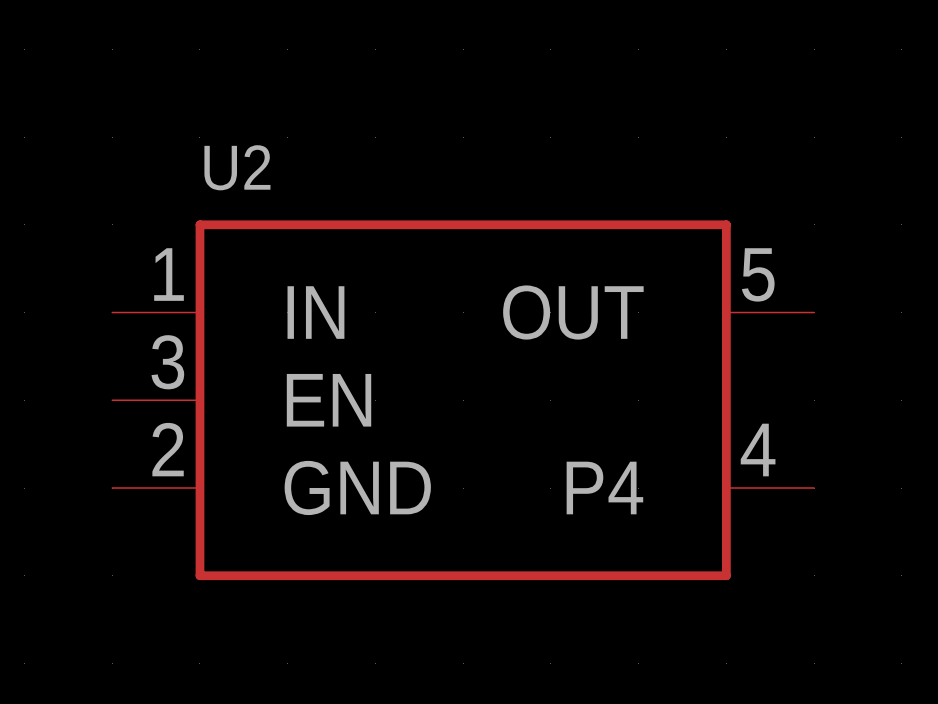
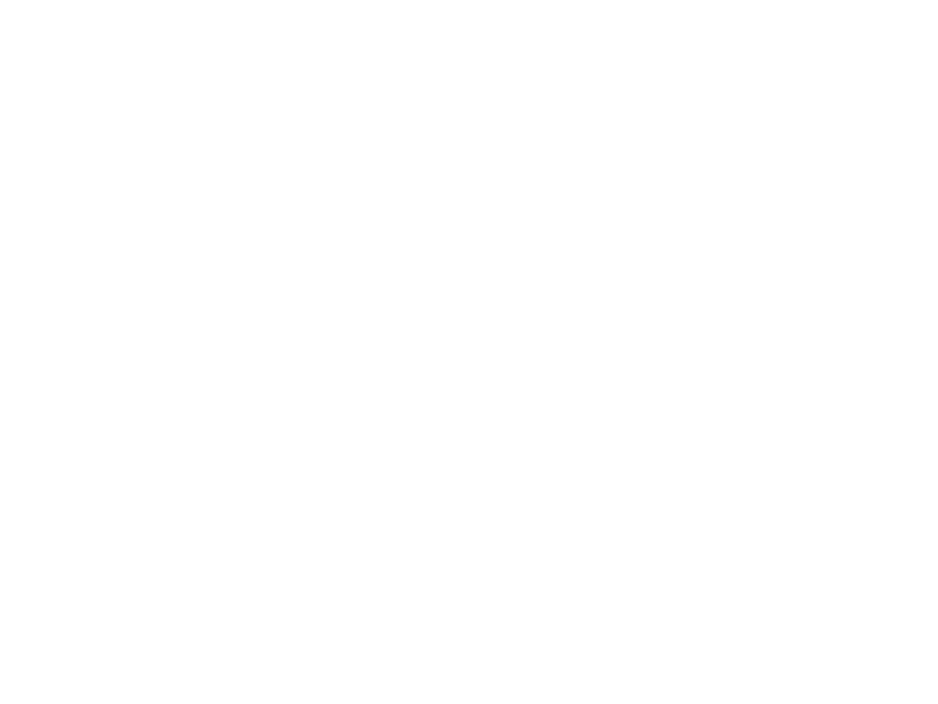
U2: (463, 400) -> none

